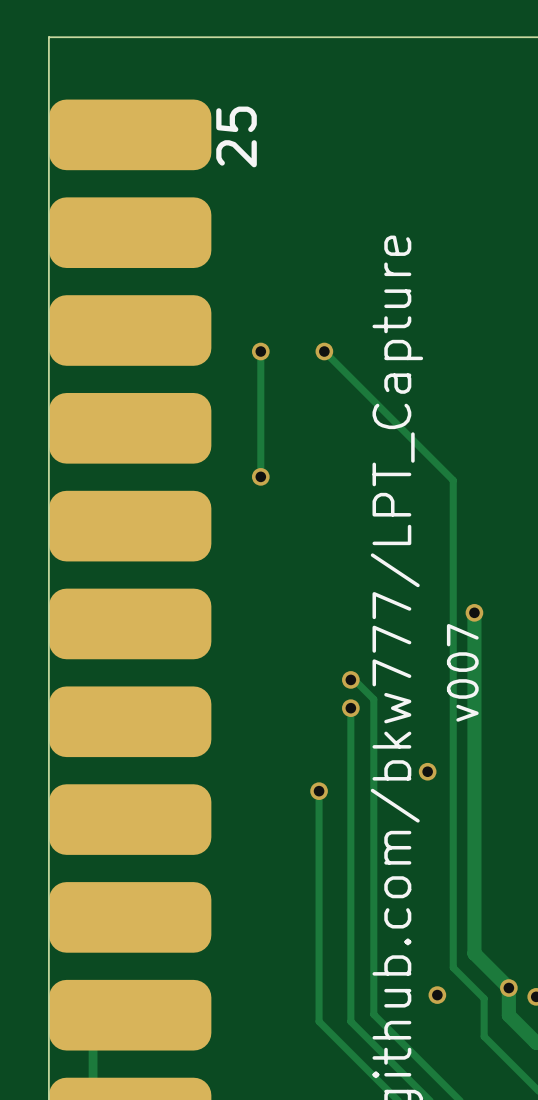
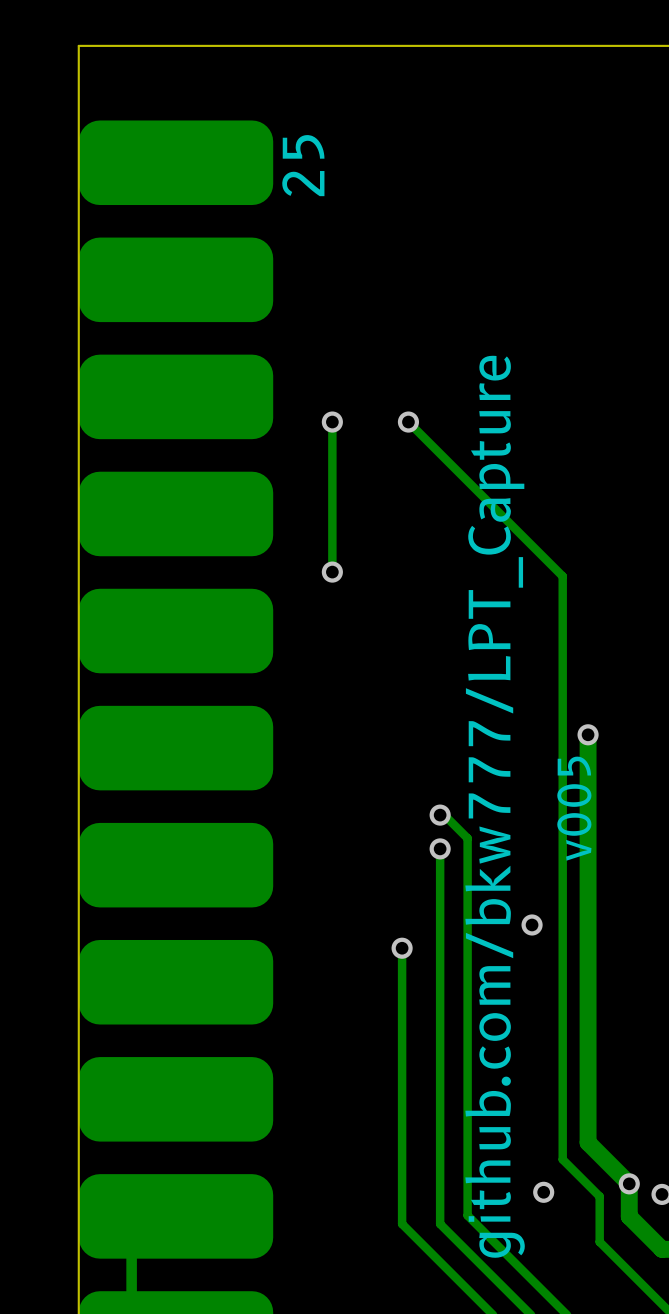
text: v007 (462, 672) -> v005 (574, 808)

